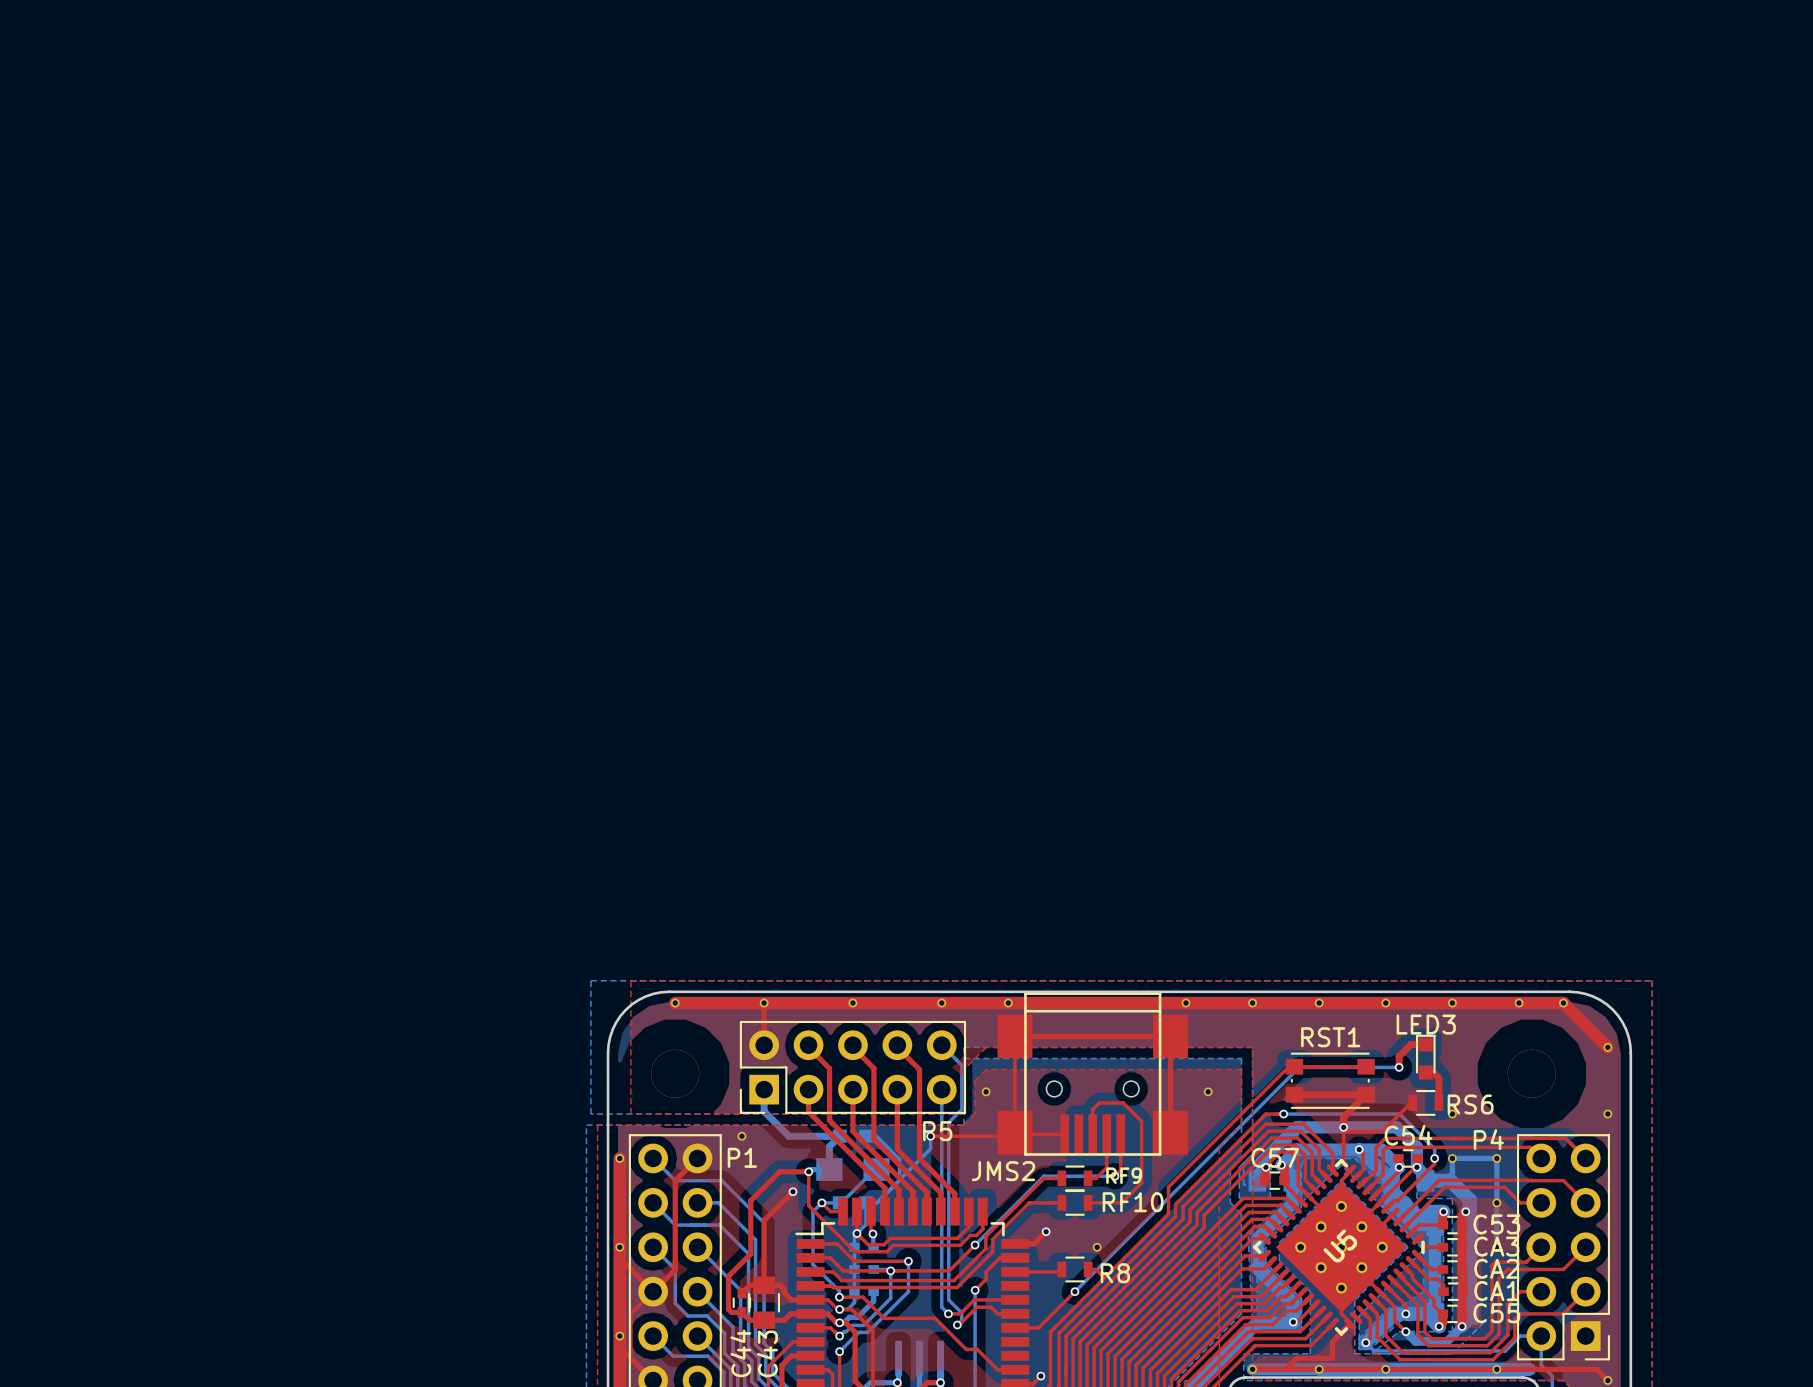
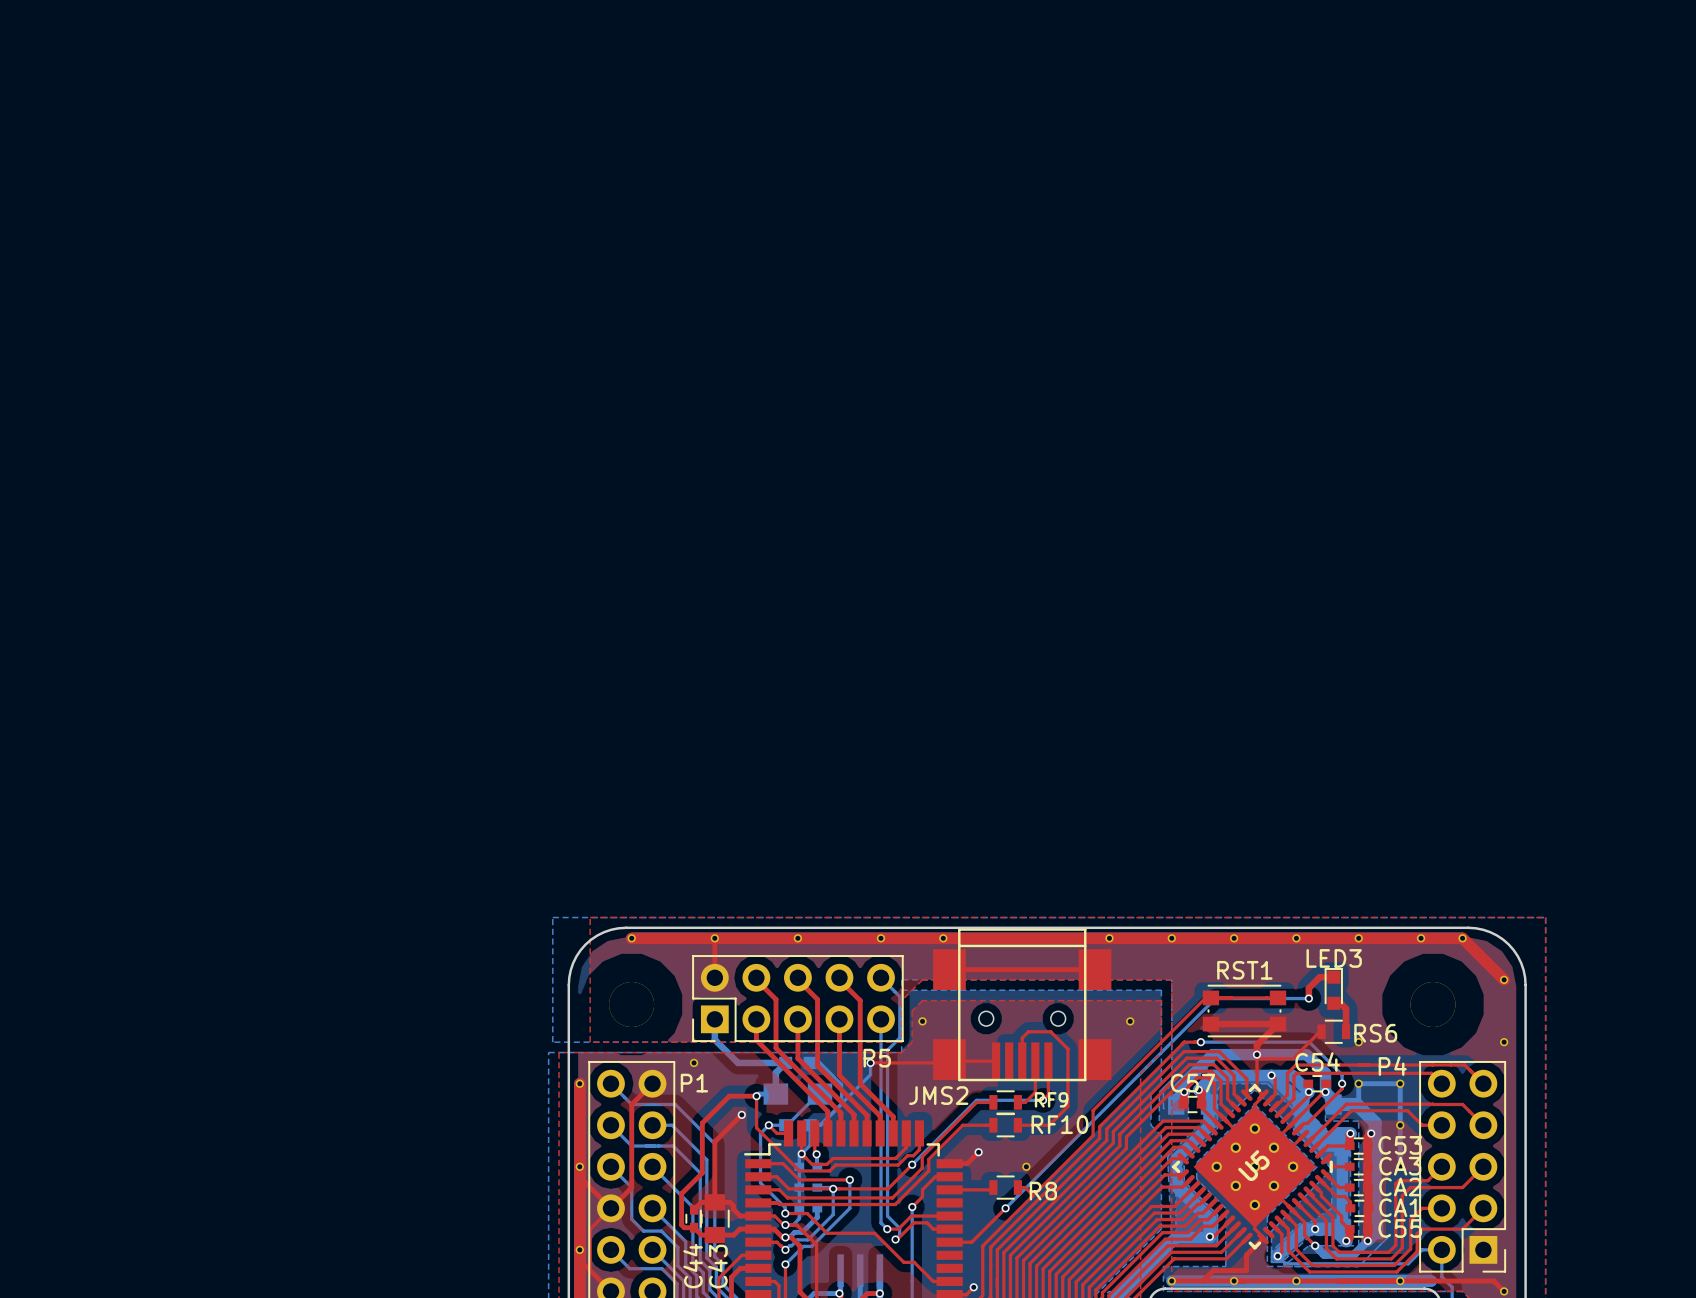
top track: (1014, 1036) (1014, 1132) -> none
top track: (1170, 1036) (1170, 1132) -> none

